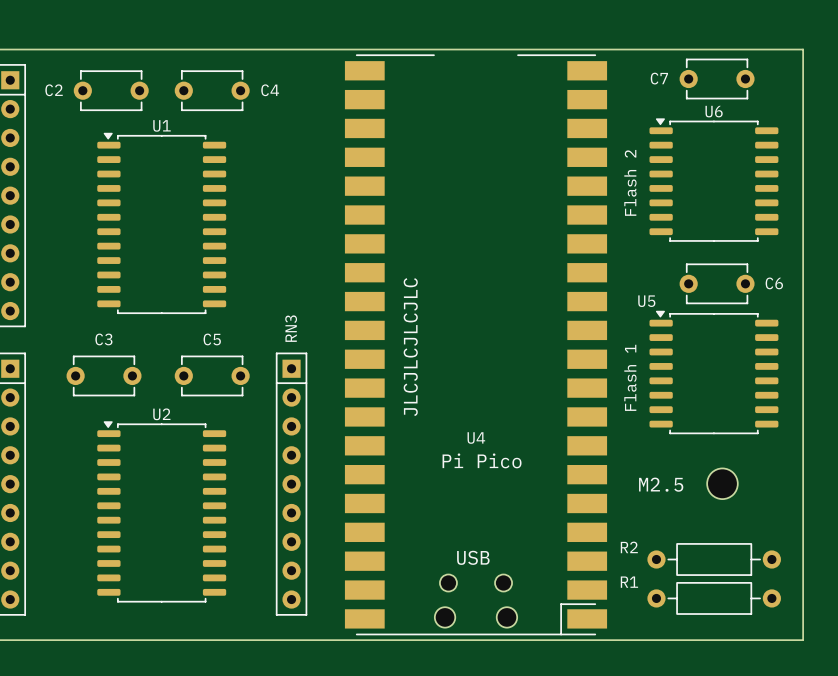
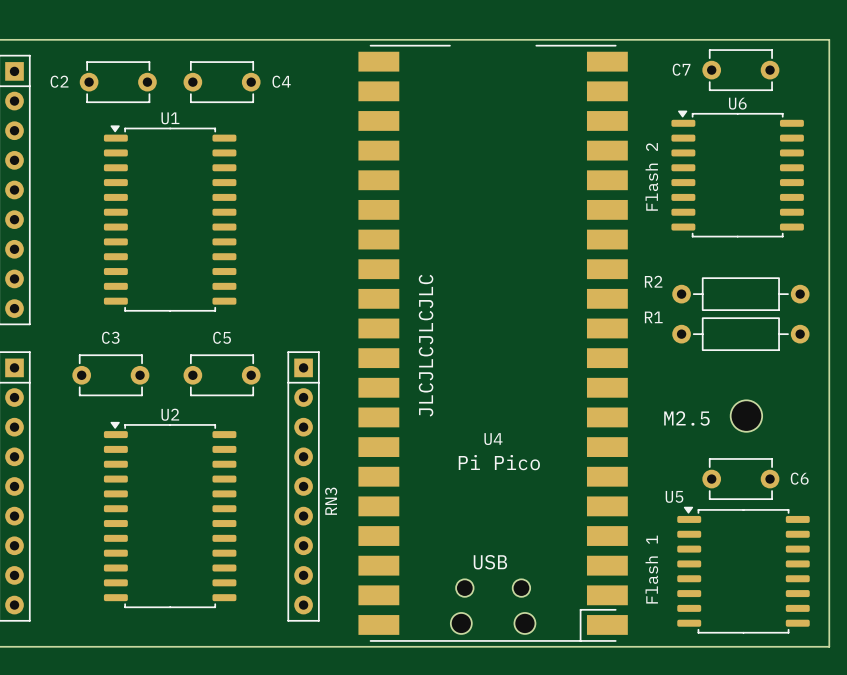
C6 position: (717, 283) -> (740, 479)
RN3 name position: RN3 (291, 328) -> RN3 (331, 501)
U5 position: (713, 372) -> (743, 570)
text position: Flash 1 (630, 377) -> Flash 1 (651, 569)
part position: (722, 483) -> (746, 416)
text position: M2.5 (661, 484) -> M2.5 (686, 418)
R2 position: (714, 559) -> (740, 294)
R1 position: (714, 598) -> (740, 334)

